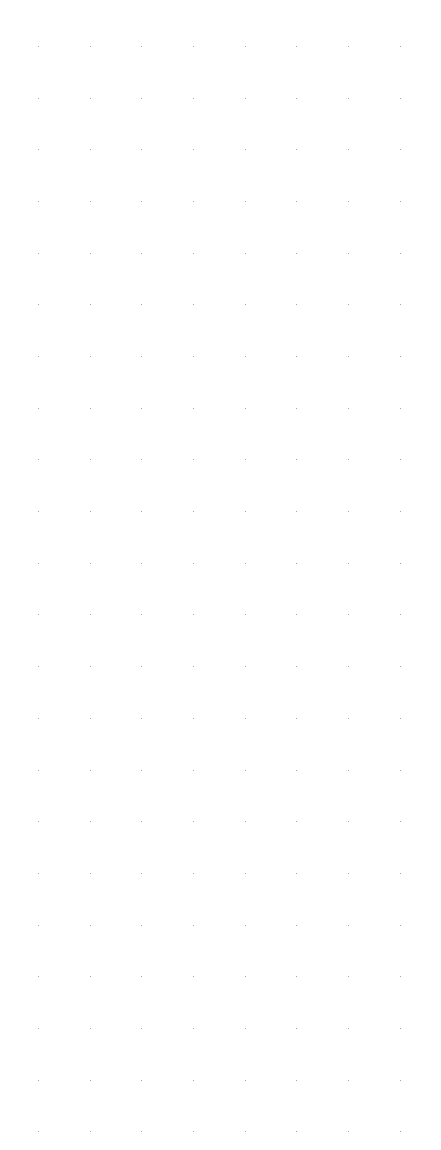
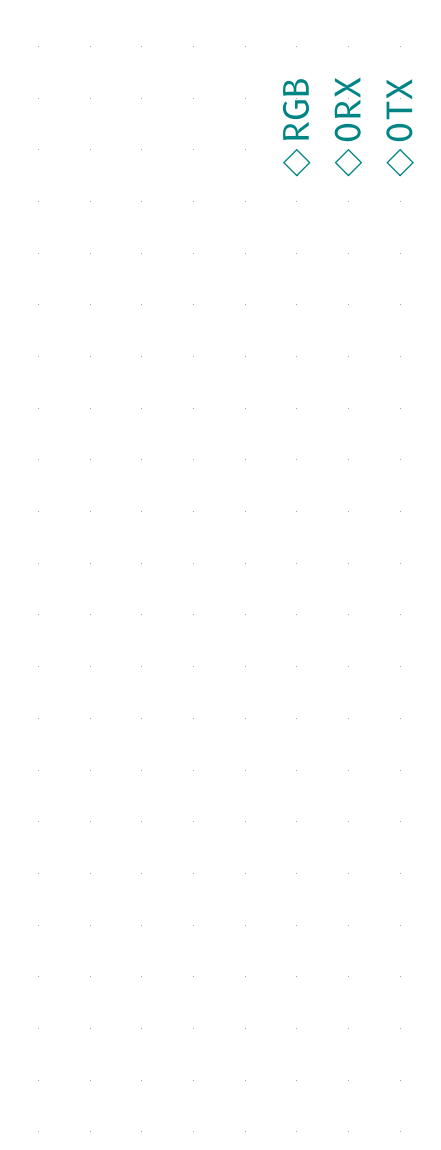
sheet pin: none -> RGB (295, 109)
sheet pin: none -> 0RX (347, 109)
sheet pin: none -> 0TX (399, 110)

